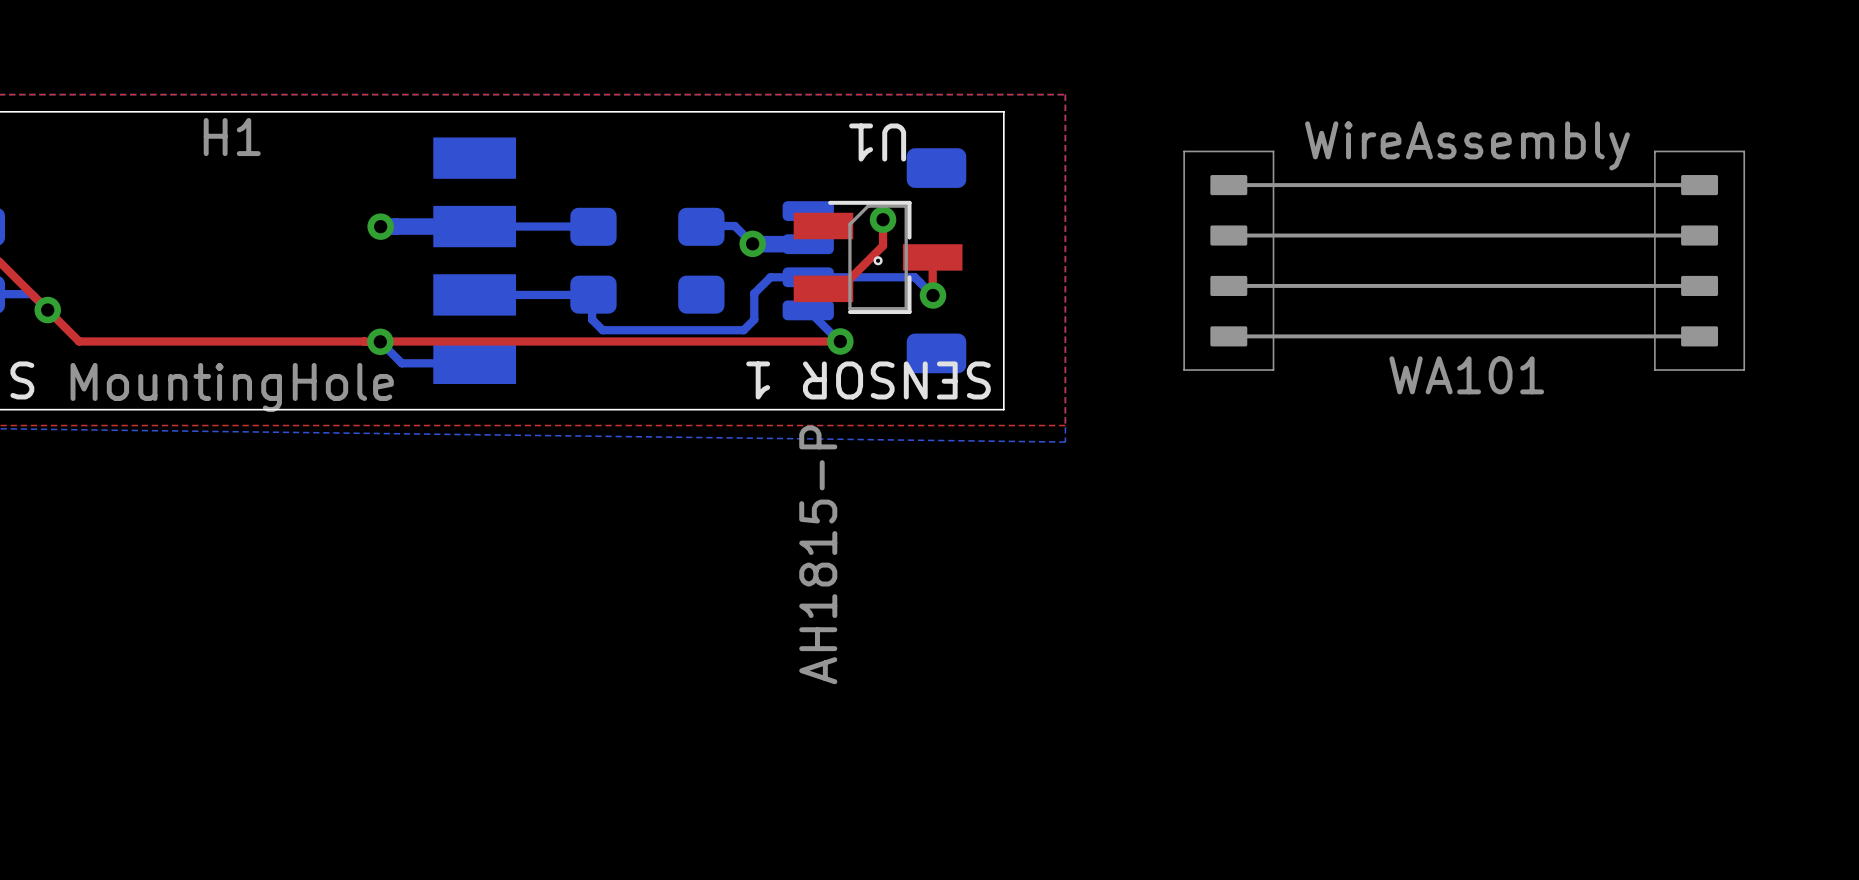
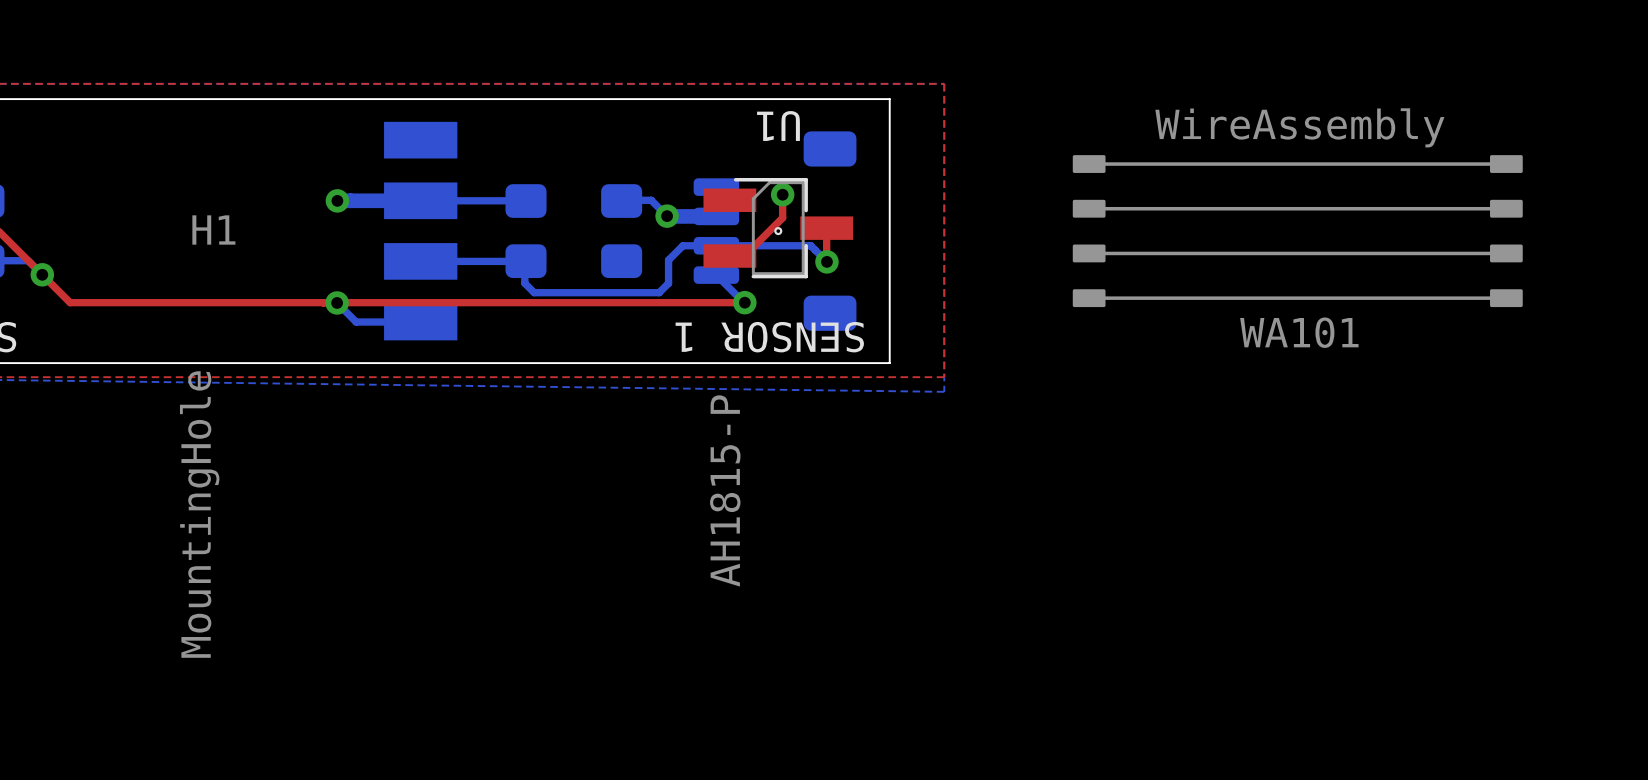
H1 name position: H1 (232, 137) -> H1 (213, 230)
WA101 footprint: [1183, 150, 1746, 371] -> [1072, 155, 1523, 308]
H1 value rotation: 0° (232, 387) -> 90° counterclockwise (199, 514)

